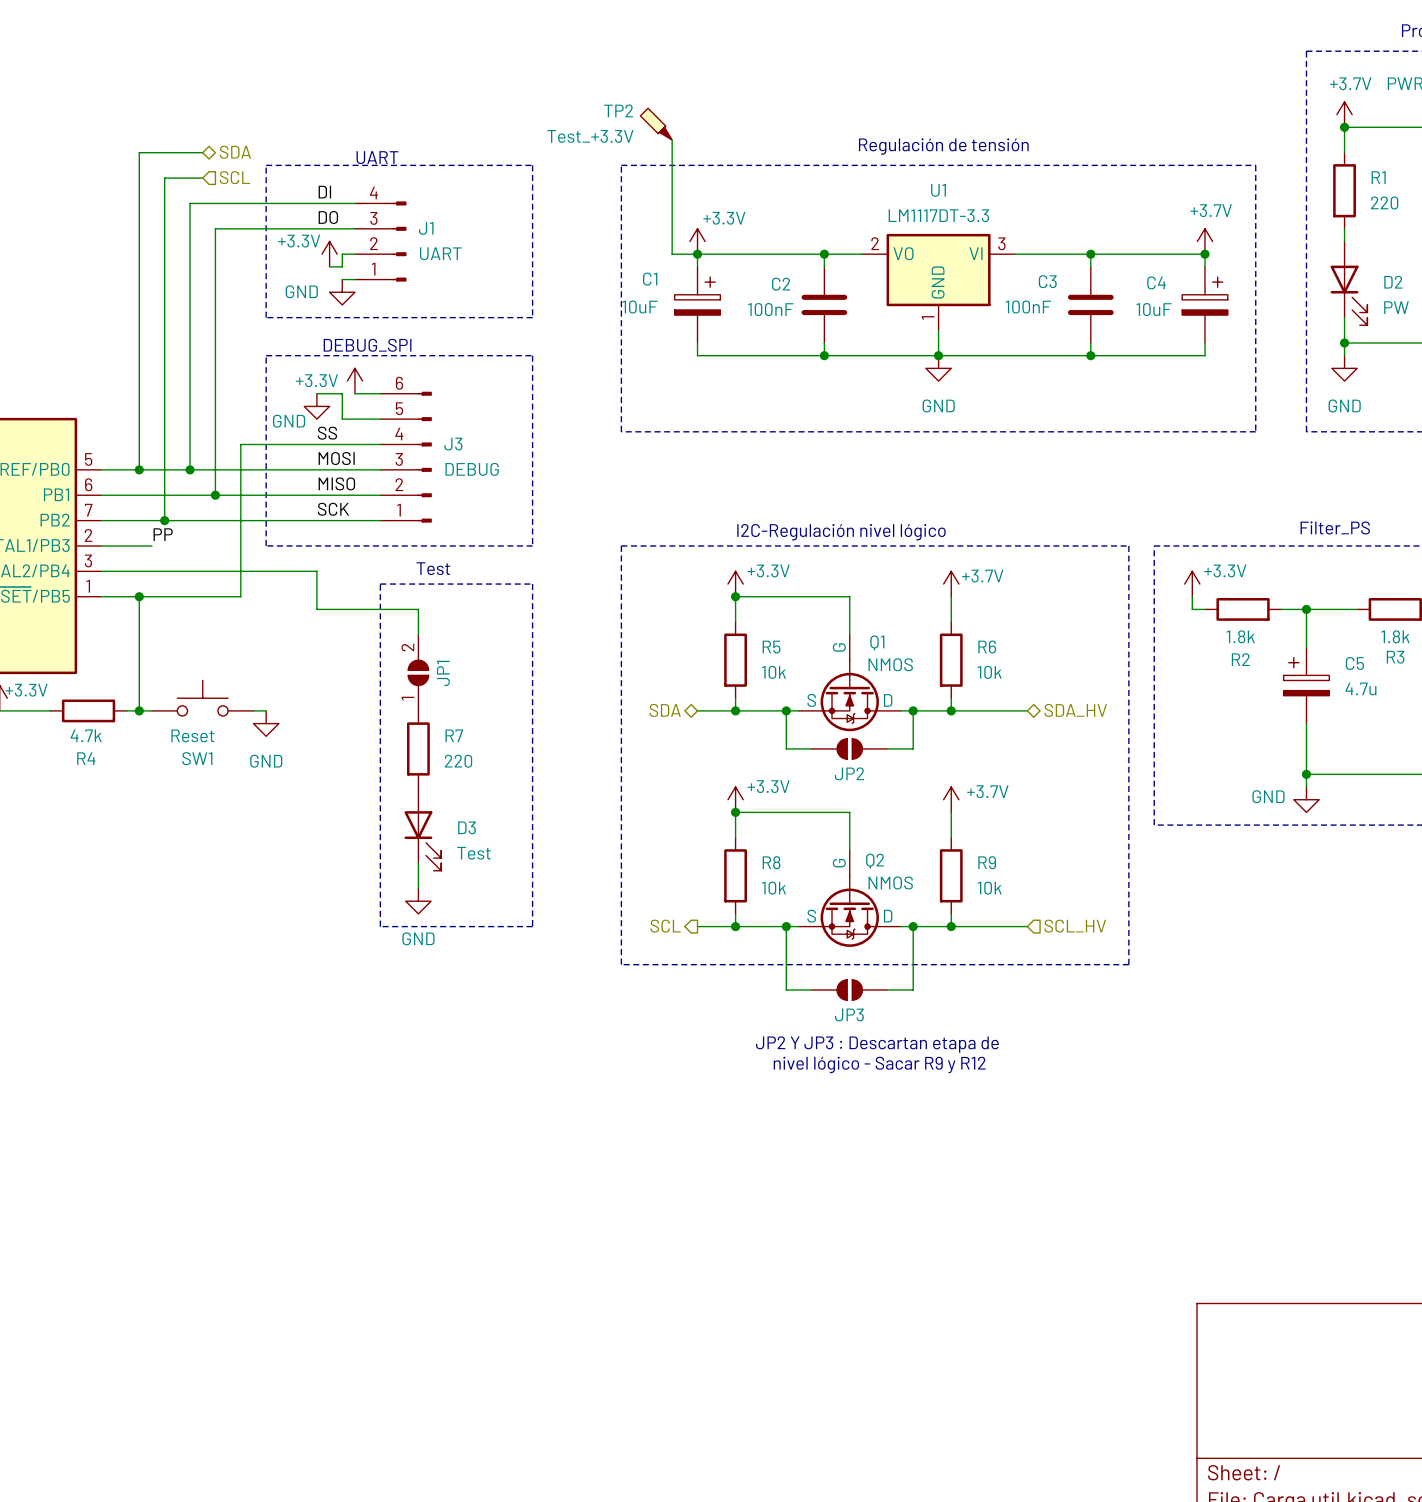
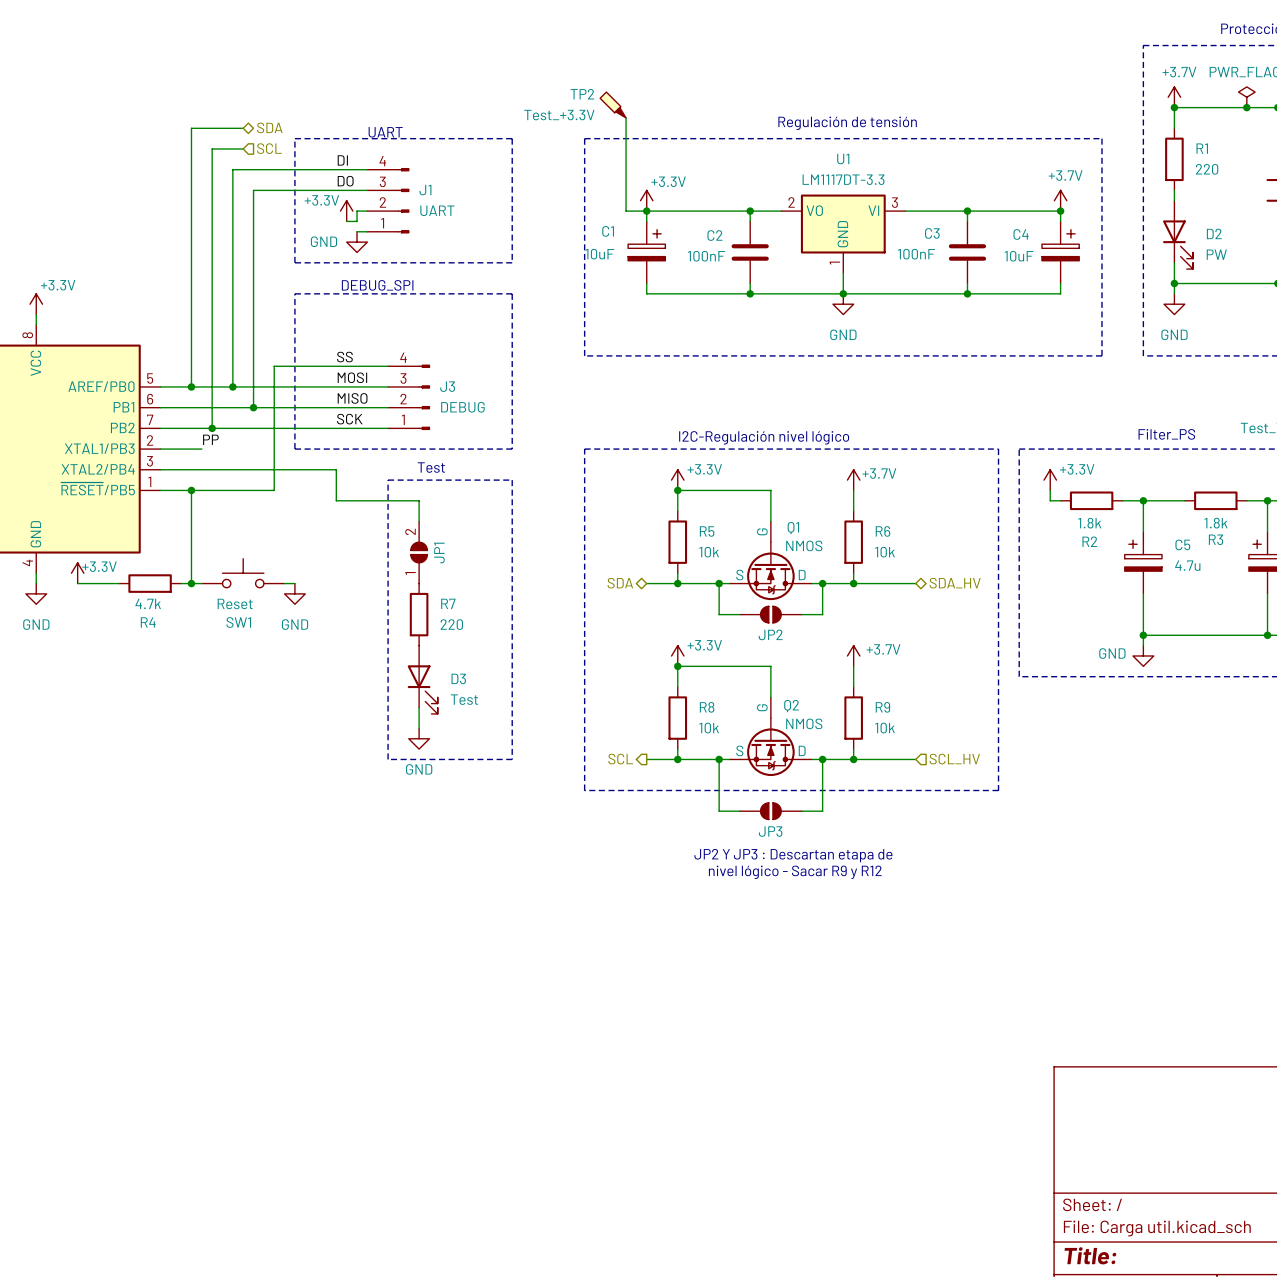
power symbol: +3.3V (354, 381) -> none
J3 symbol: [380, 391, 432, 523] -> [388, 364, 431, 431]
wire: (316, 393) (342, 393) (342, 419) (380, 419) -> none
wire: (354, 393) (380, 393) -> none
power symbol: GND (316, 406) -> none

